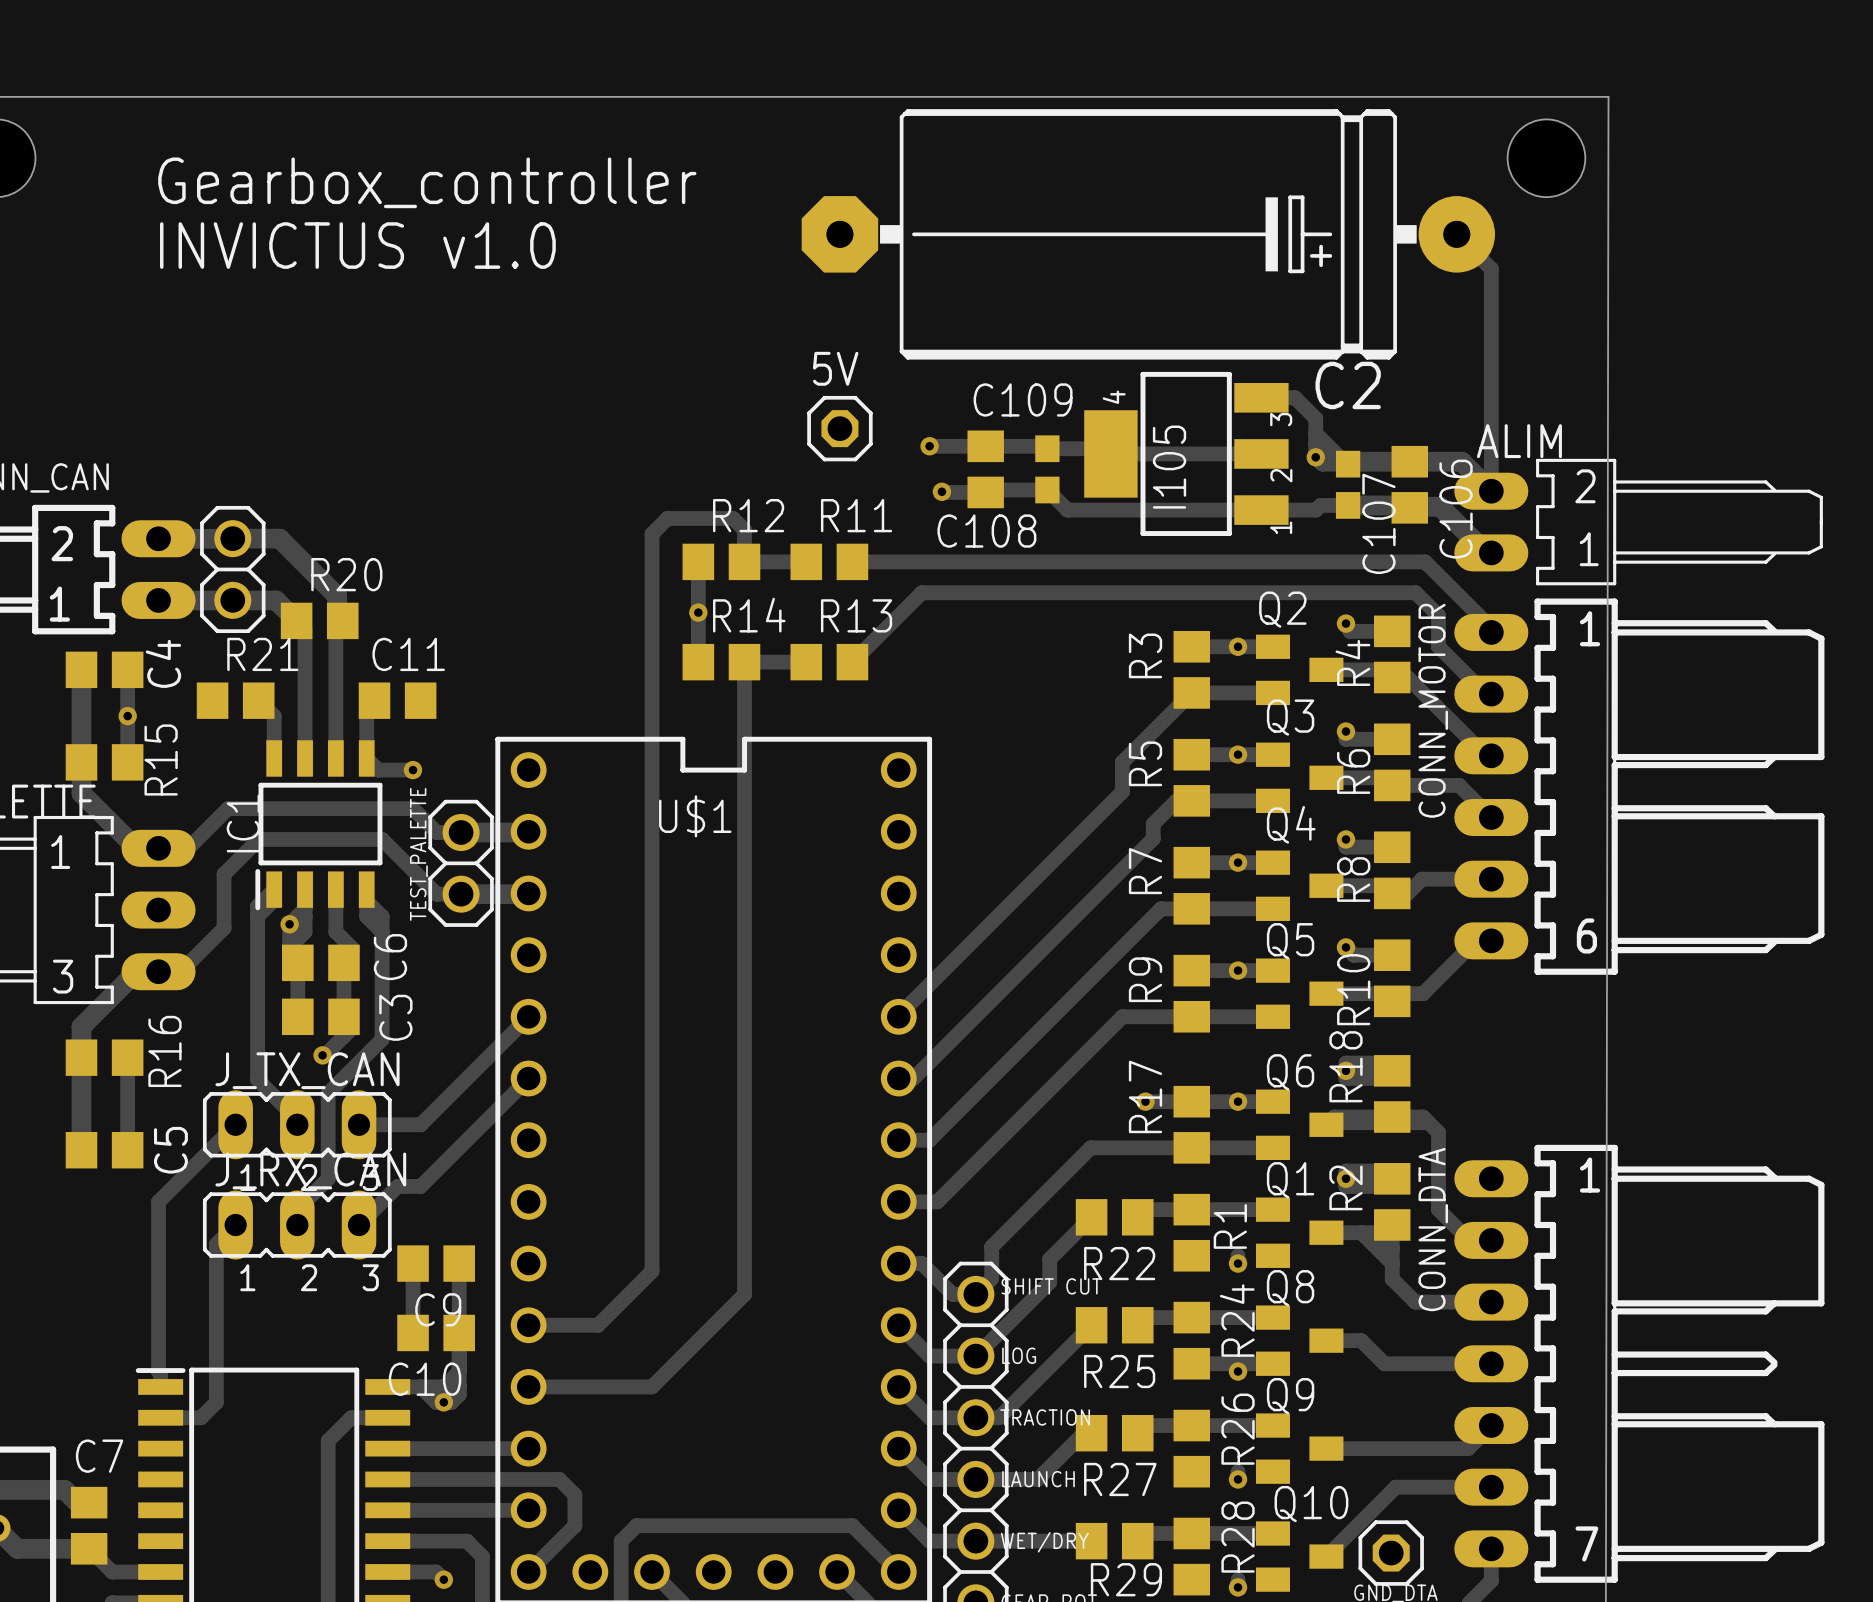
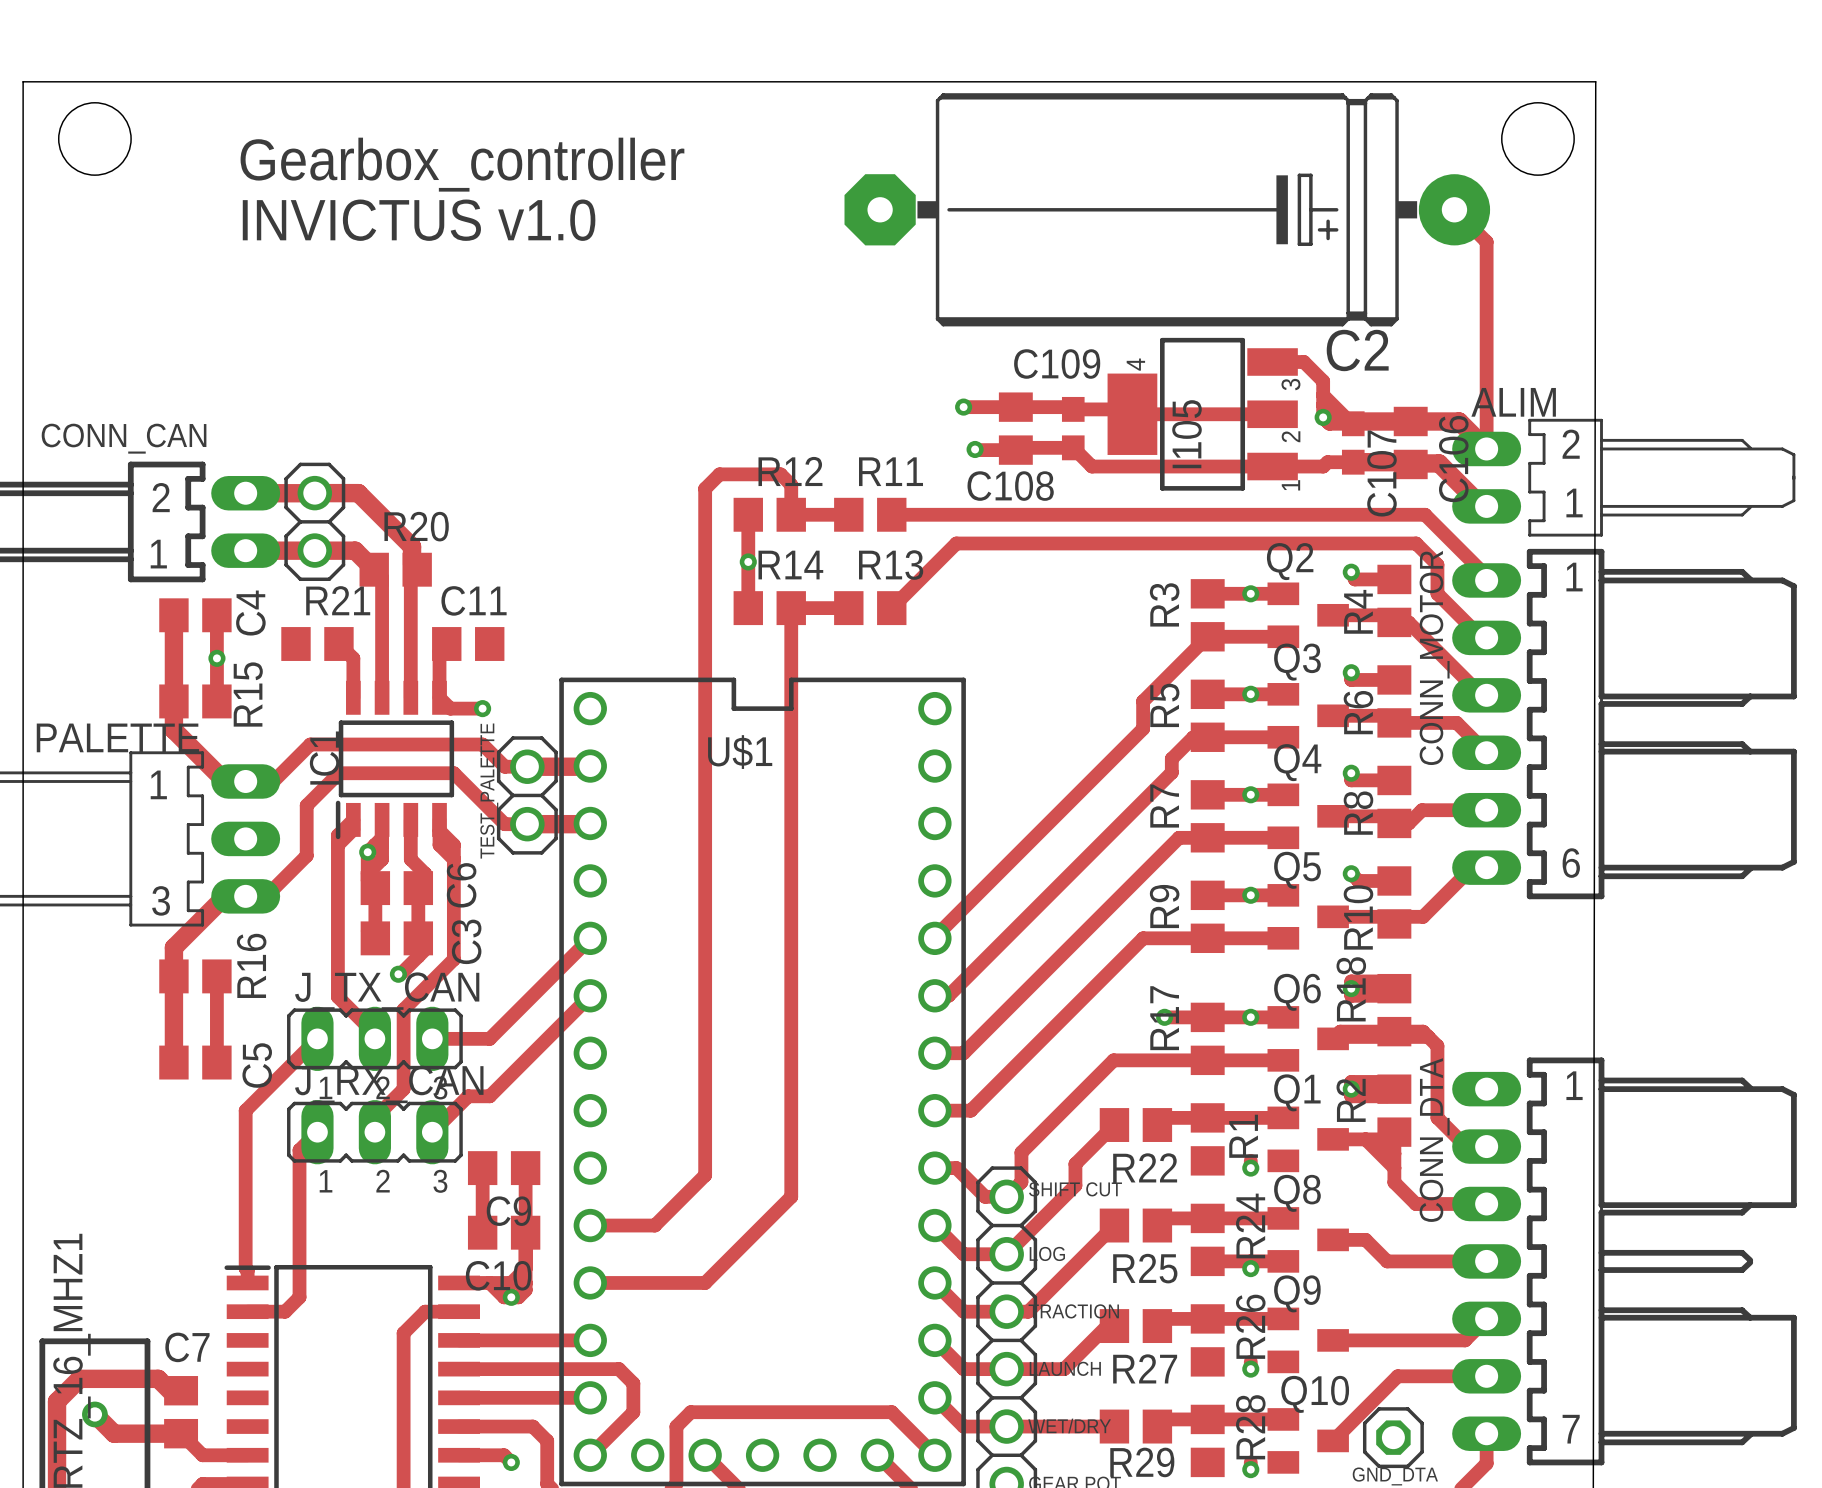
5V: (839, 428) -> none

